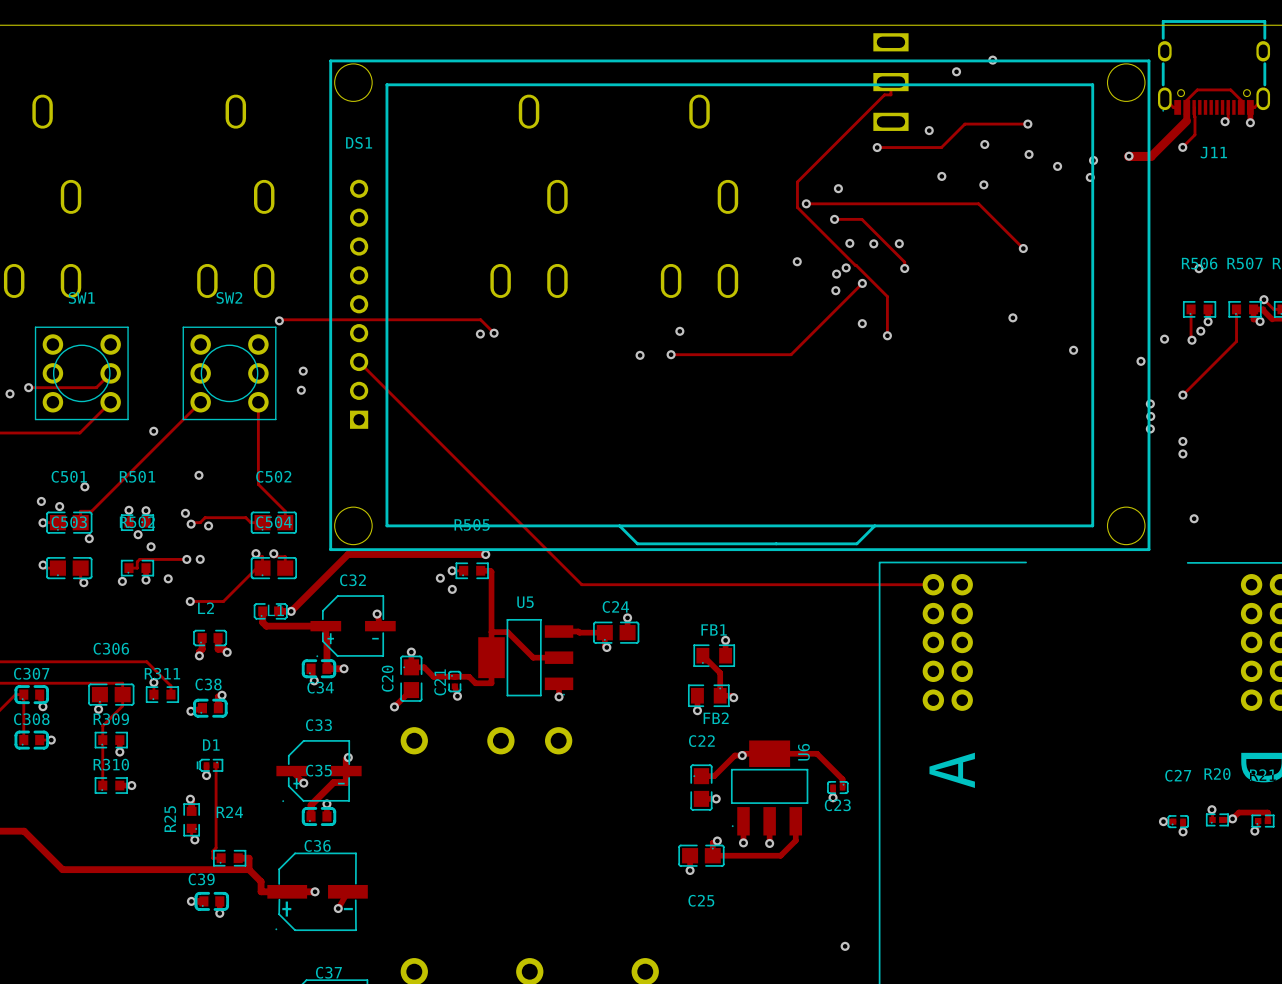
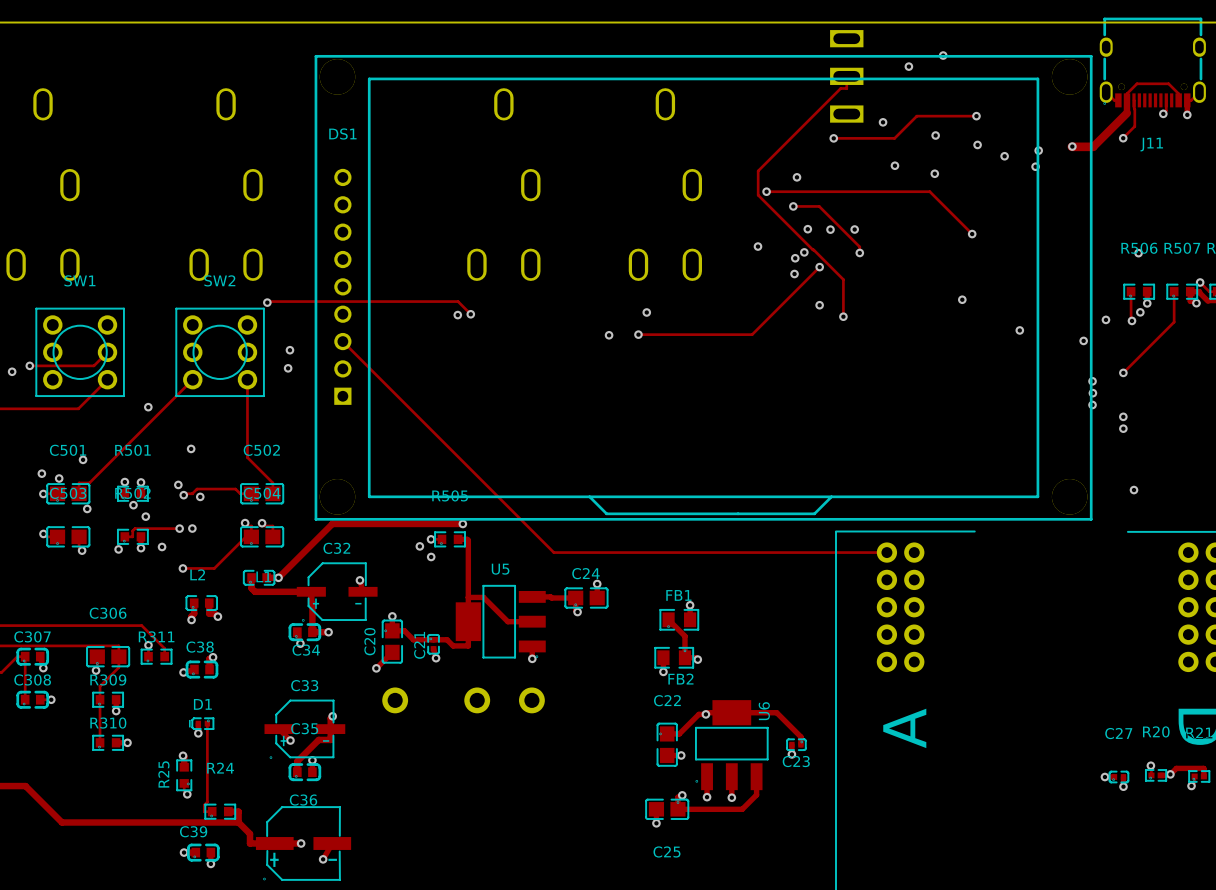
J11 footprint: [1157, 20, 1271, 115] -> [1099, 17, 1206, 108]
DS1 footprint: [329, 59, 1151, 552] -> [314, 54, 1093, 521]

